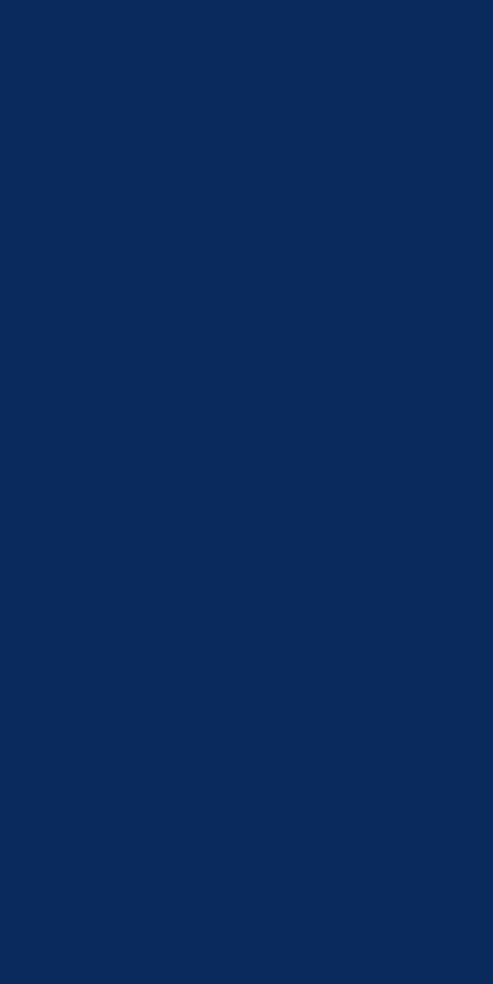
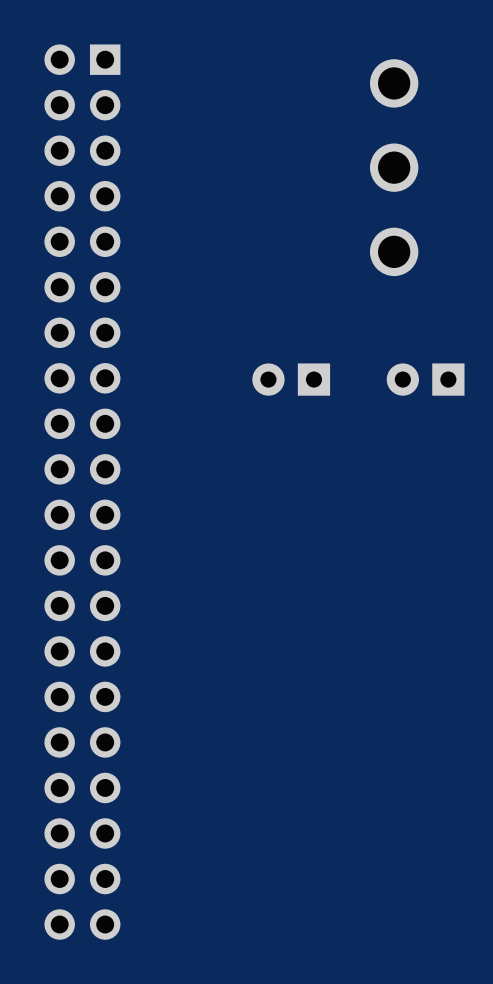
part: none -> (394, 167)
part: none -> (291, 379)
part: none -> (425, 379)
part: none -> (82, 492)

